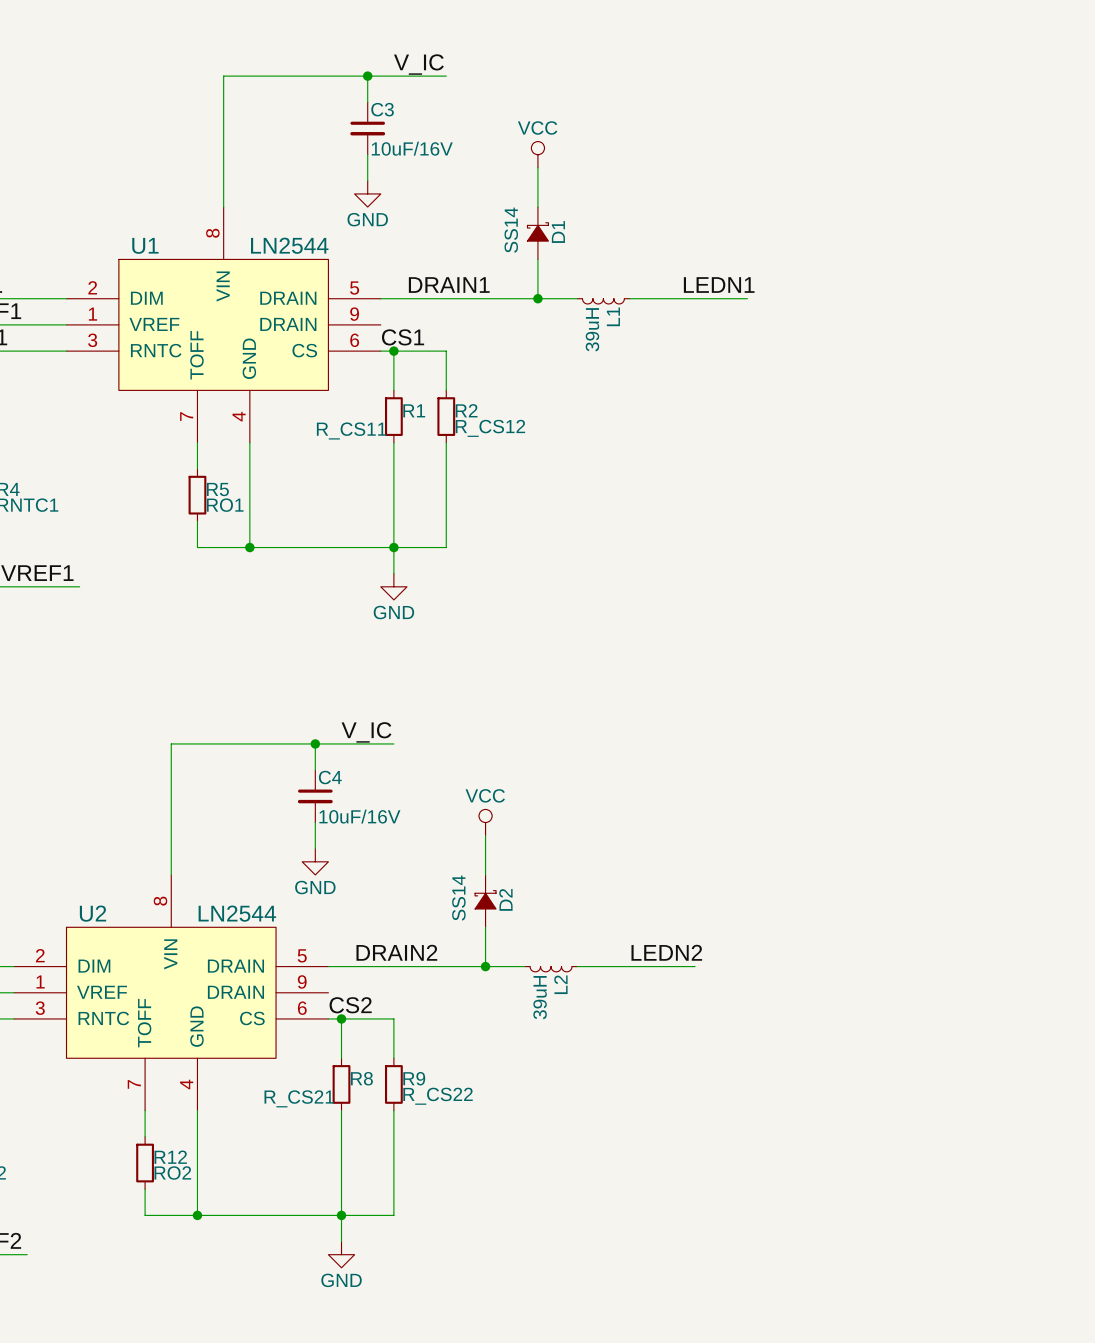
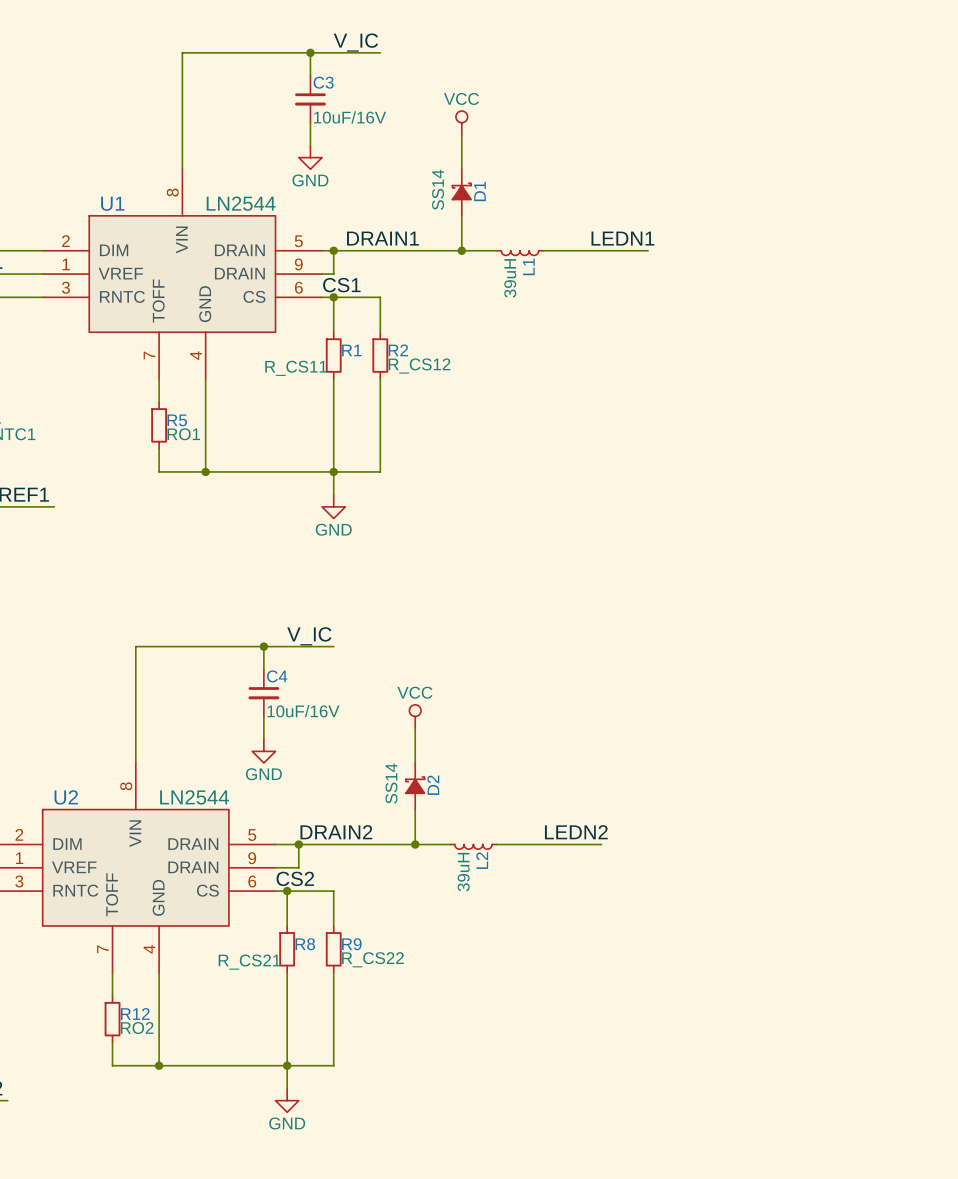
wire: none -> (333, 250) (333, 274) (322, 274)
junction: none -> (333, 250)
wire: none -> (298, 844) (298, 867) (275, 867)
junction: none -> (298, 844)

